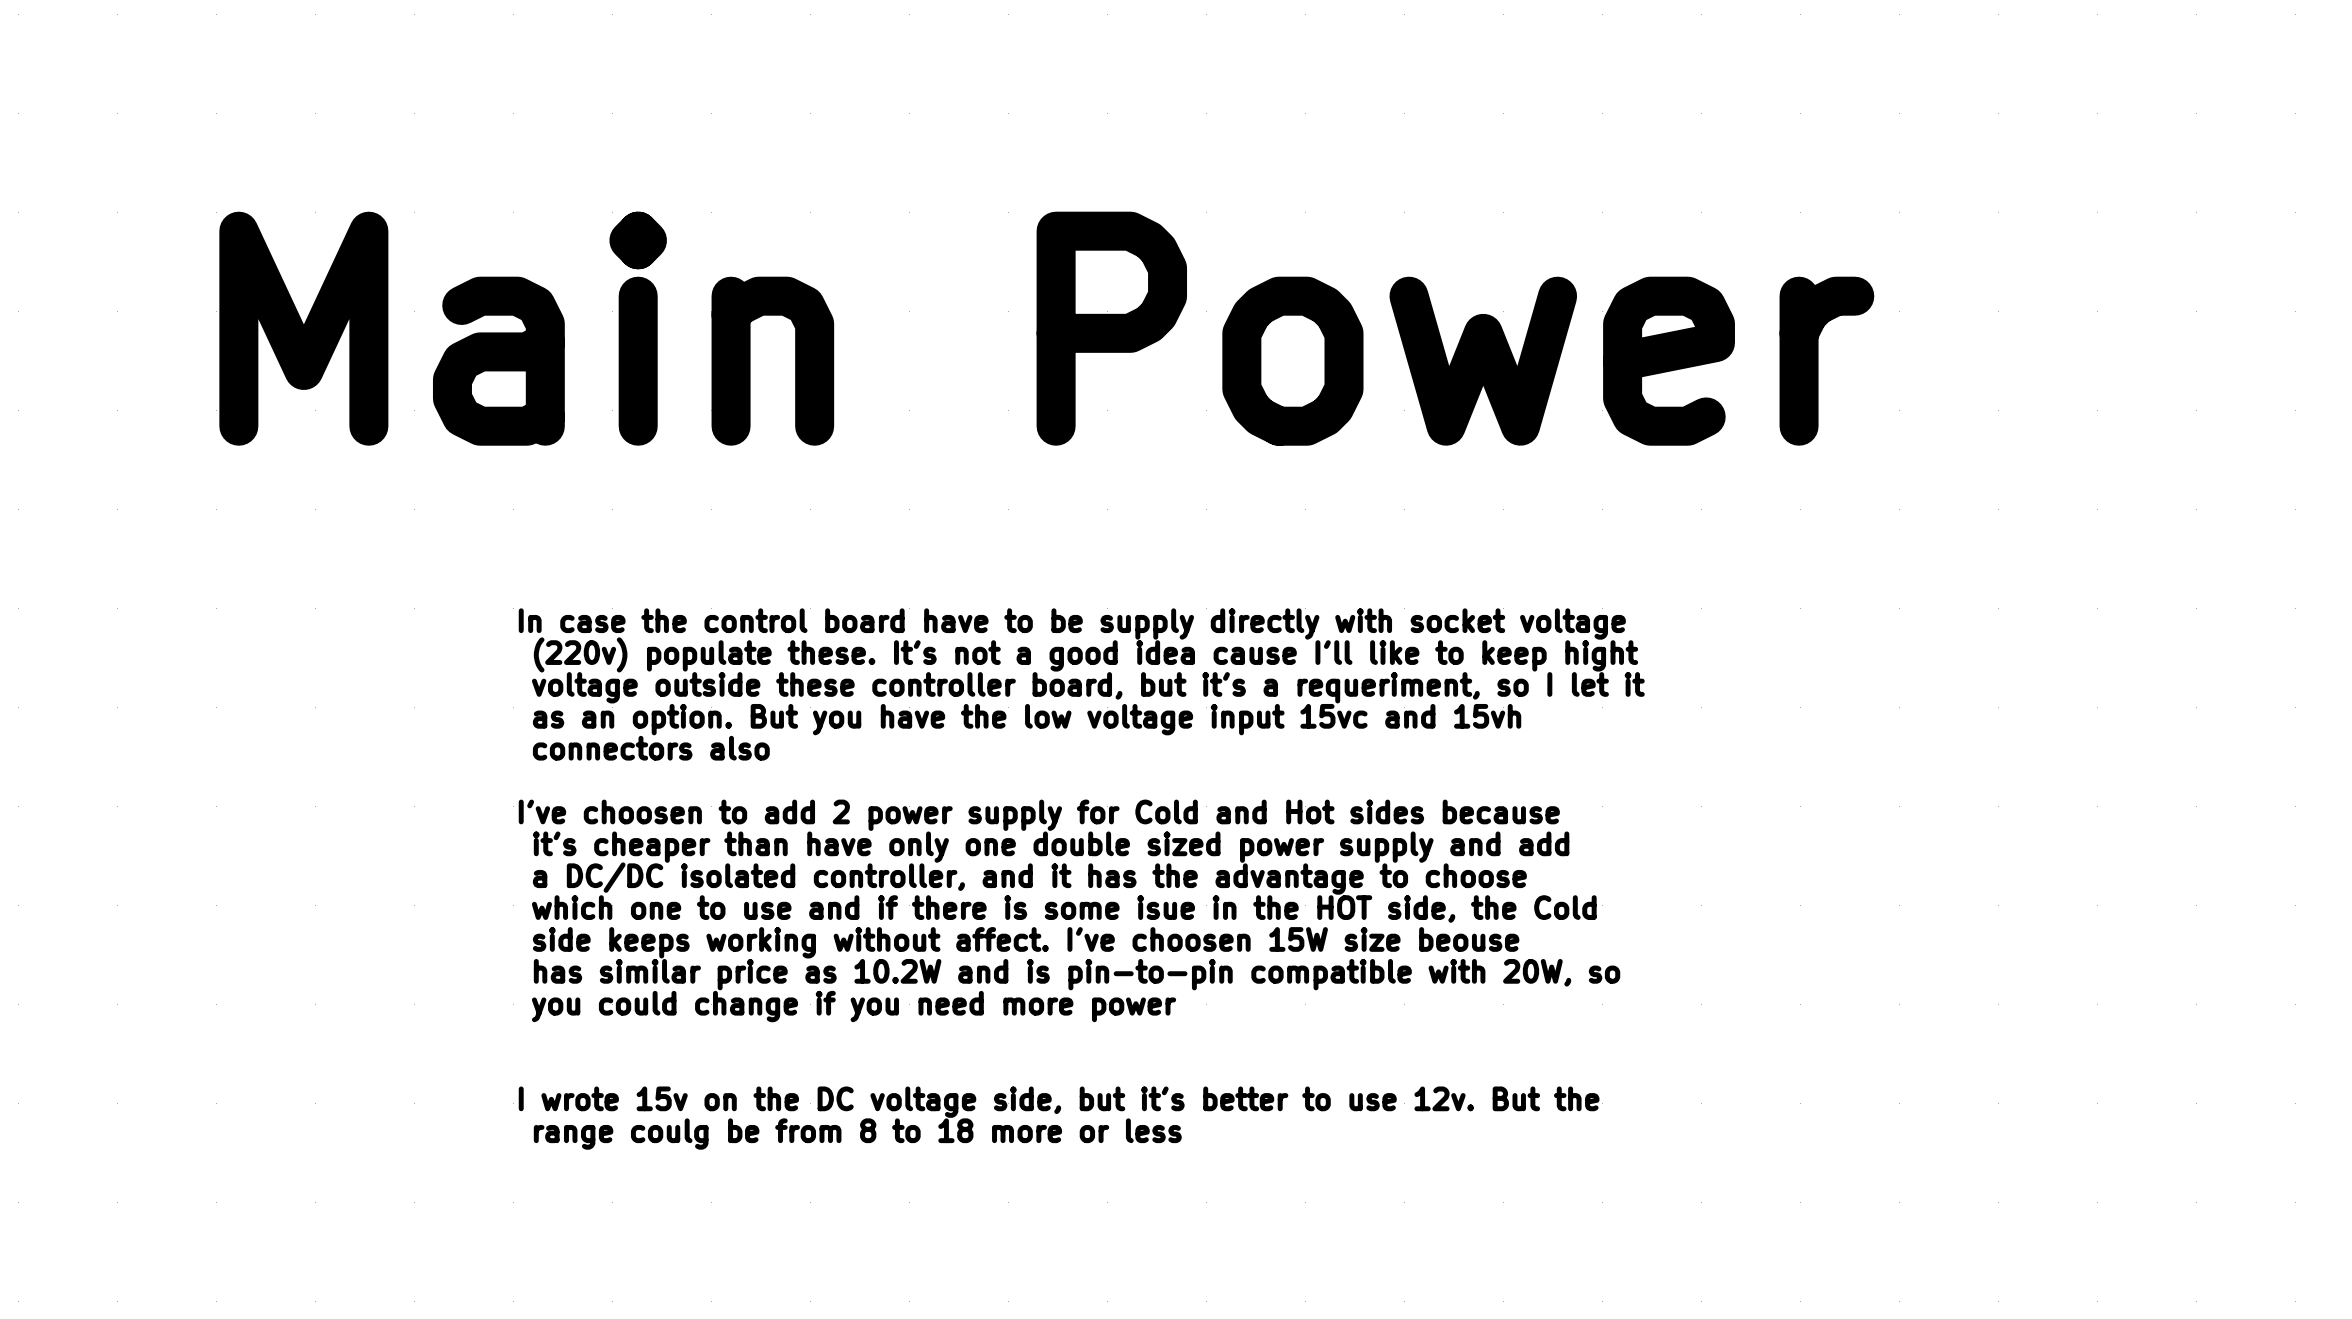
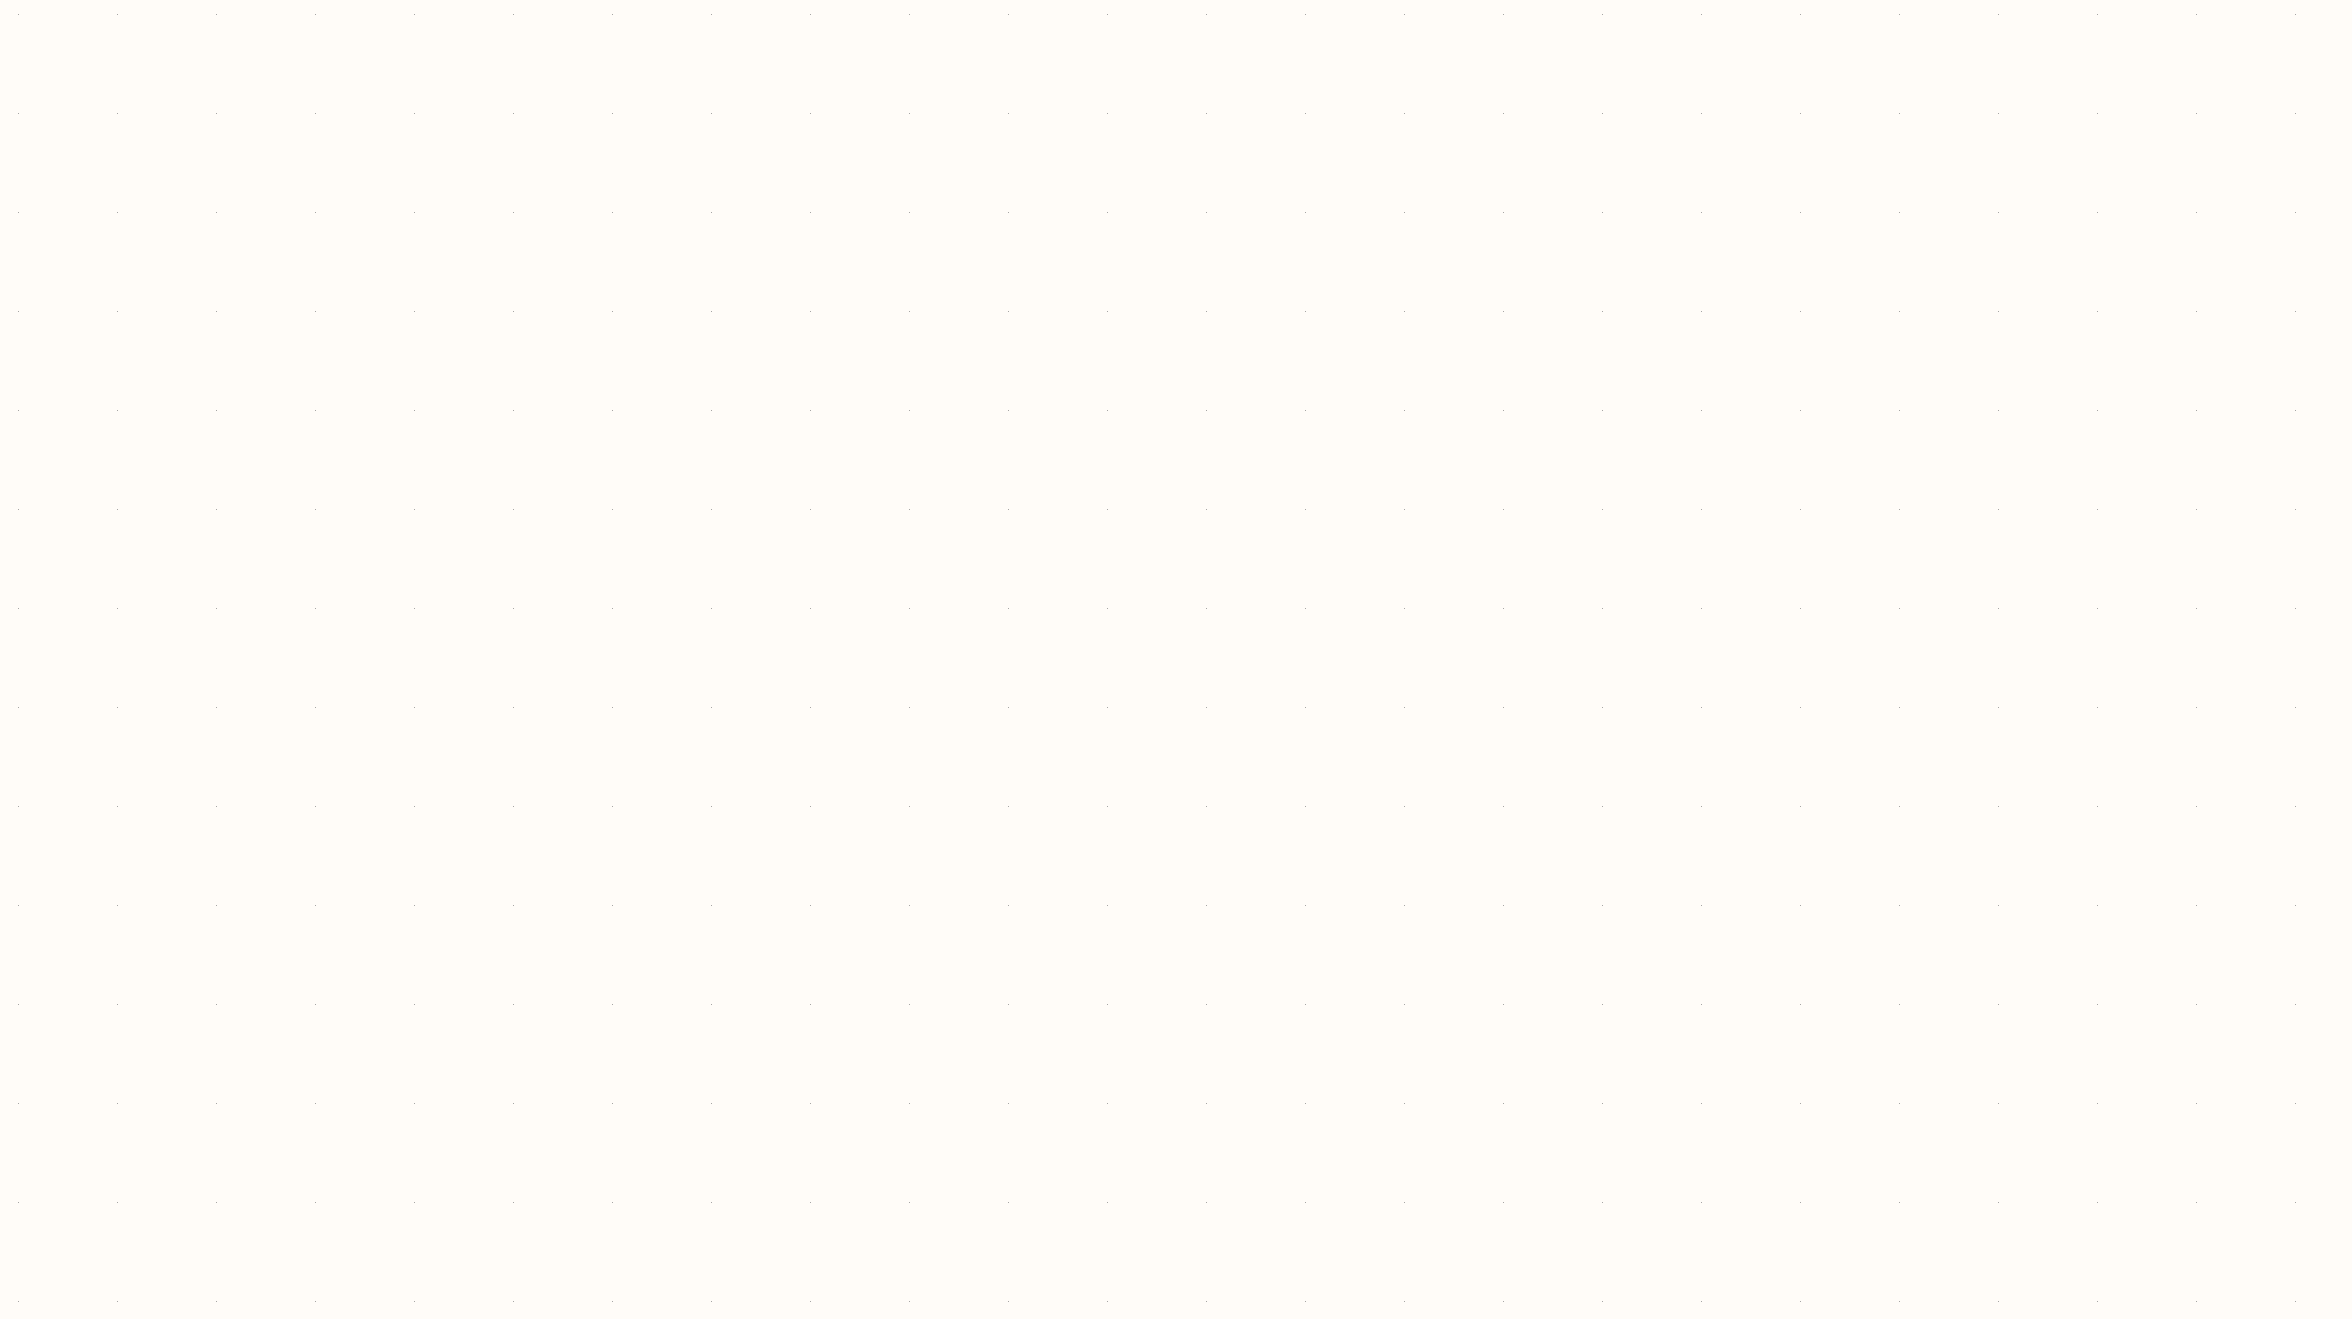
text: Main Power (1046, 328) -> none
text: In case the control board have to be supply directly with socket voltage (1072, 624) -> none
text: (220v) populate these. It's not a good idea cause I'll like to keep hight (1085, 654) -> none
text: voltage outside these controller board, but it's a requeriment, so I let it (1088, 687) -> none
text: as an option. But you have the low voltage input 15vc and 15vh (1027, 719) -> none
text: connectors also (651, 748) -> none
text: I've choosen to add 2 power supply for Cold and Hot sides because (1039, 815) -> none
text: it's cheaper than have only one double sized power supply and add (1051, 847) -> none
text: a DC/DC isolated controller, and it has the advantage to choose (1029, 878) -> none
text: which one to use and if there is some isue in the HOT side, the Cold (1064, 909) -> none
text: side keeps working without affect. I've choosen 15W size beouse (1026, 942) -> none
text: has similar price as 10.2W and is pin-to-pin compatible with 20W, so (1077, 974) -> none
text: you could change if you need more power (854, 1006) -> none
text: I wrote 15v on the DC voltage side, but it's better to use 12v. But the (1059, 1102) -> none
text: range coulg be from 8 to 18 more or less (857, 1134) -> none

